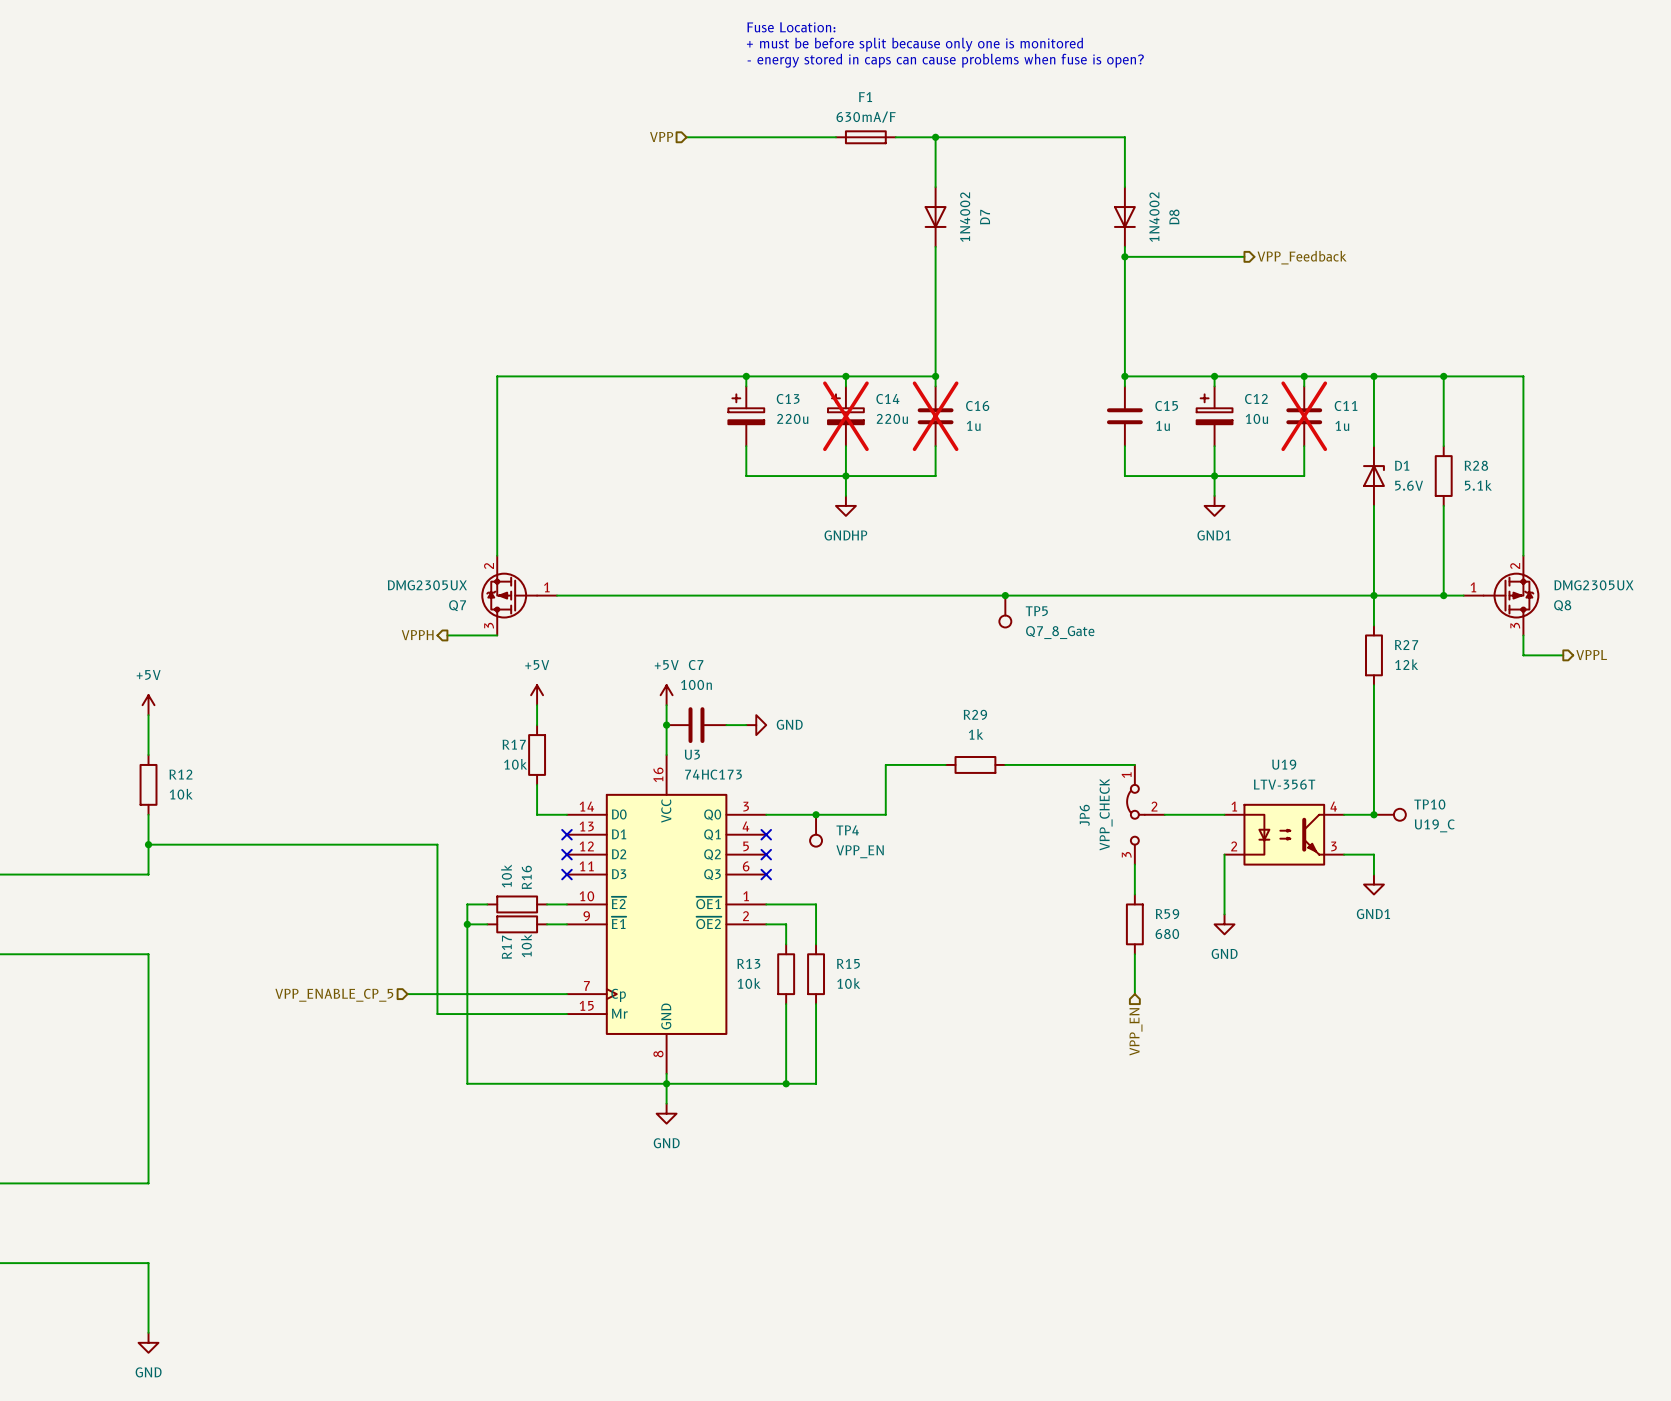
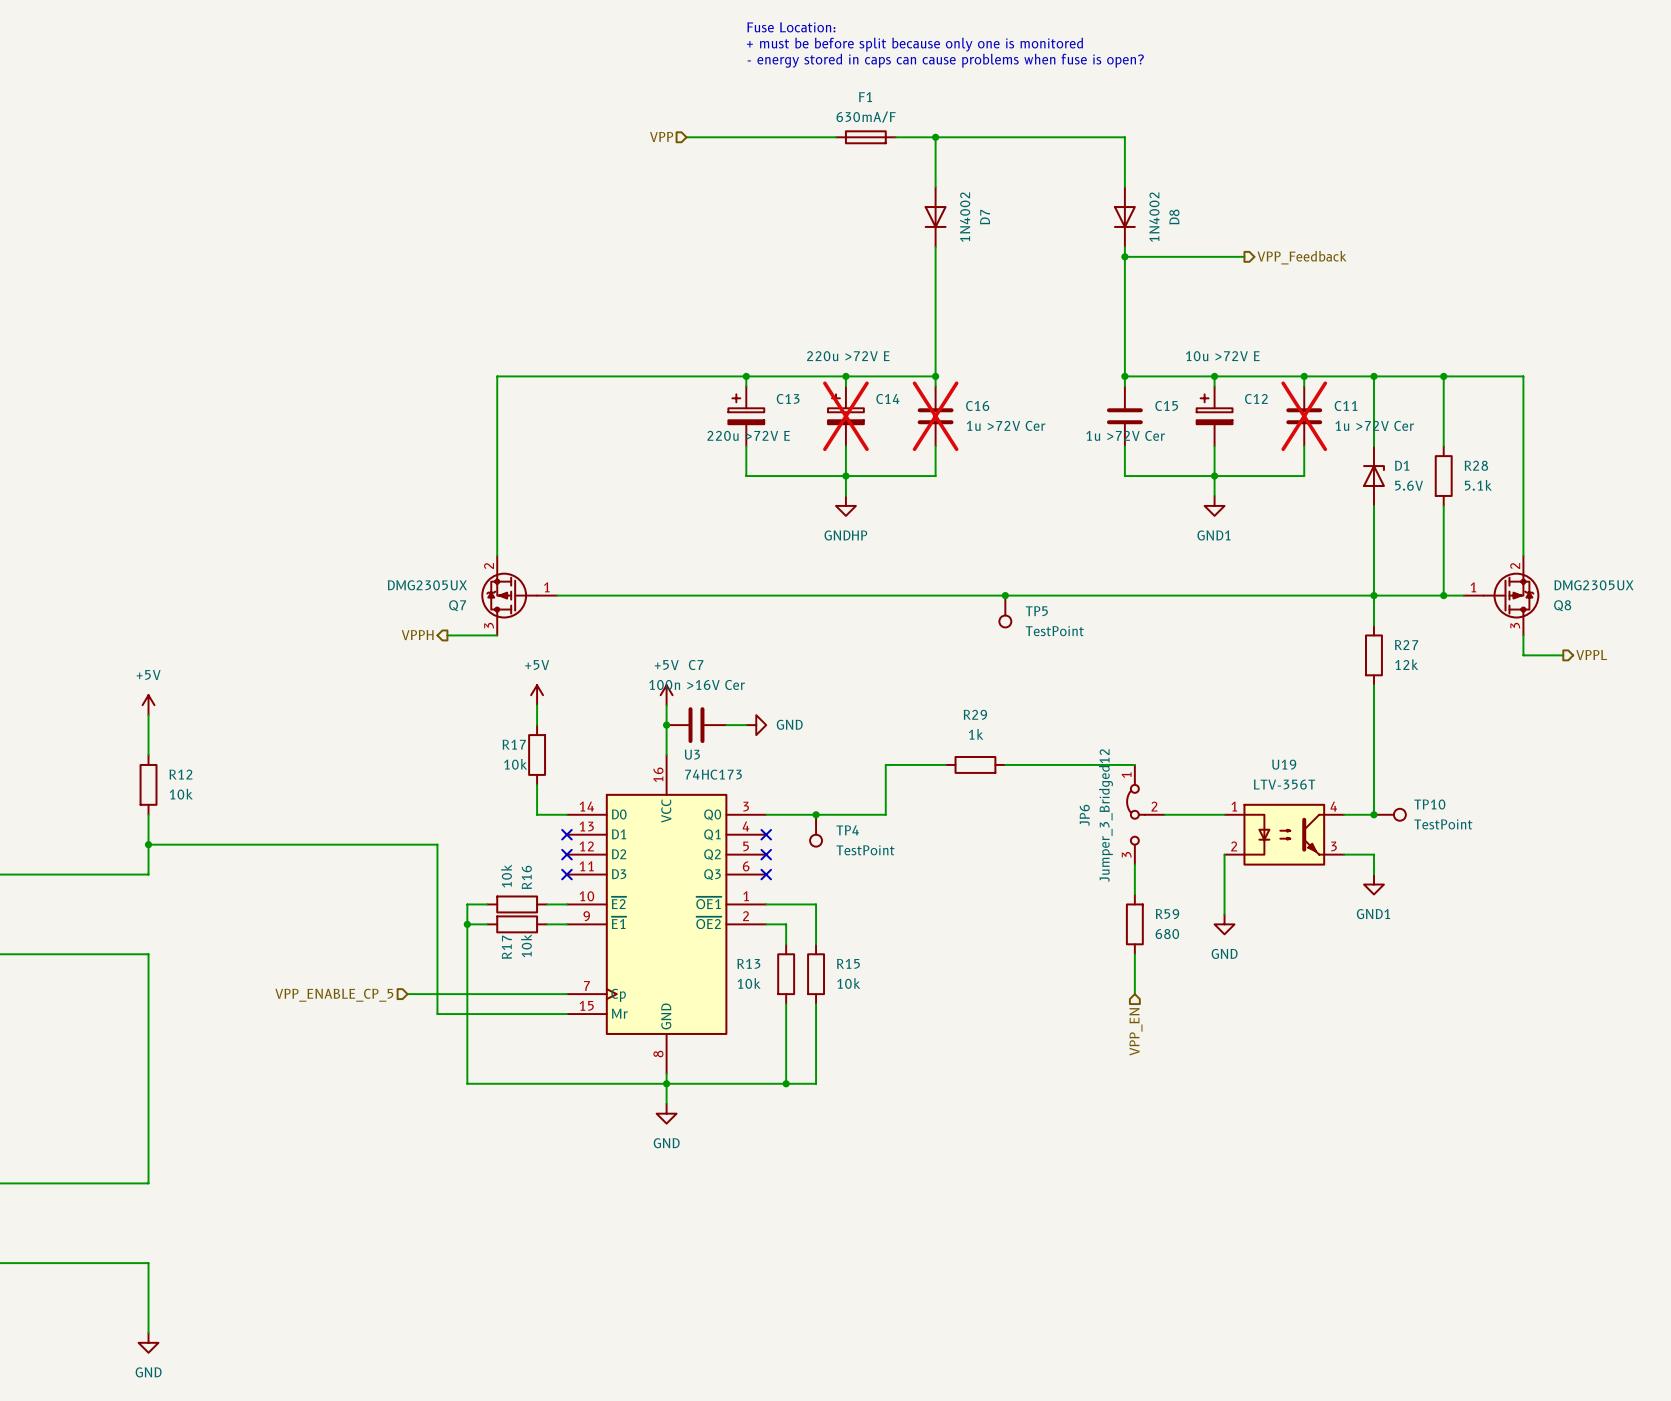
C13 value: 220u (792, 418) -> 220u >72V E (748, 435)
C14 value: 220u (892, 418) -> 220u >72V E (848, 356)
C12 value: 10u (1256, 418) -> 10u >72V E (1222, 356)
C16 value: 1u (973, 425) -> 1u >72V Cer (1006, 425)
C15 value: 1u (1162, 425) -> 1u >72V Cer (1125, 435)
C11 value: 1u (1342, 425) -> 1u >72V Cer (1374, 425)
TP5 value: Q7_8_Gate (1060, 632) -> TestPoint (1054, 631)
C7 value: 100n (696, 684) -> 100n >16V Cer (697, 684)
JP6 value: VPP_CHECK (1106, 814) -> Jumper_3_Bridged12 (1105, 815)
TP10 value: U19_C (1434, 825) -> TestPoint (1443, 824)
TP4 value: VPP_EN (860, 851) -> TestPoint (865, 850)

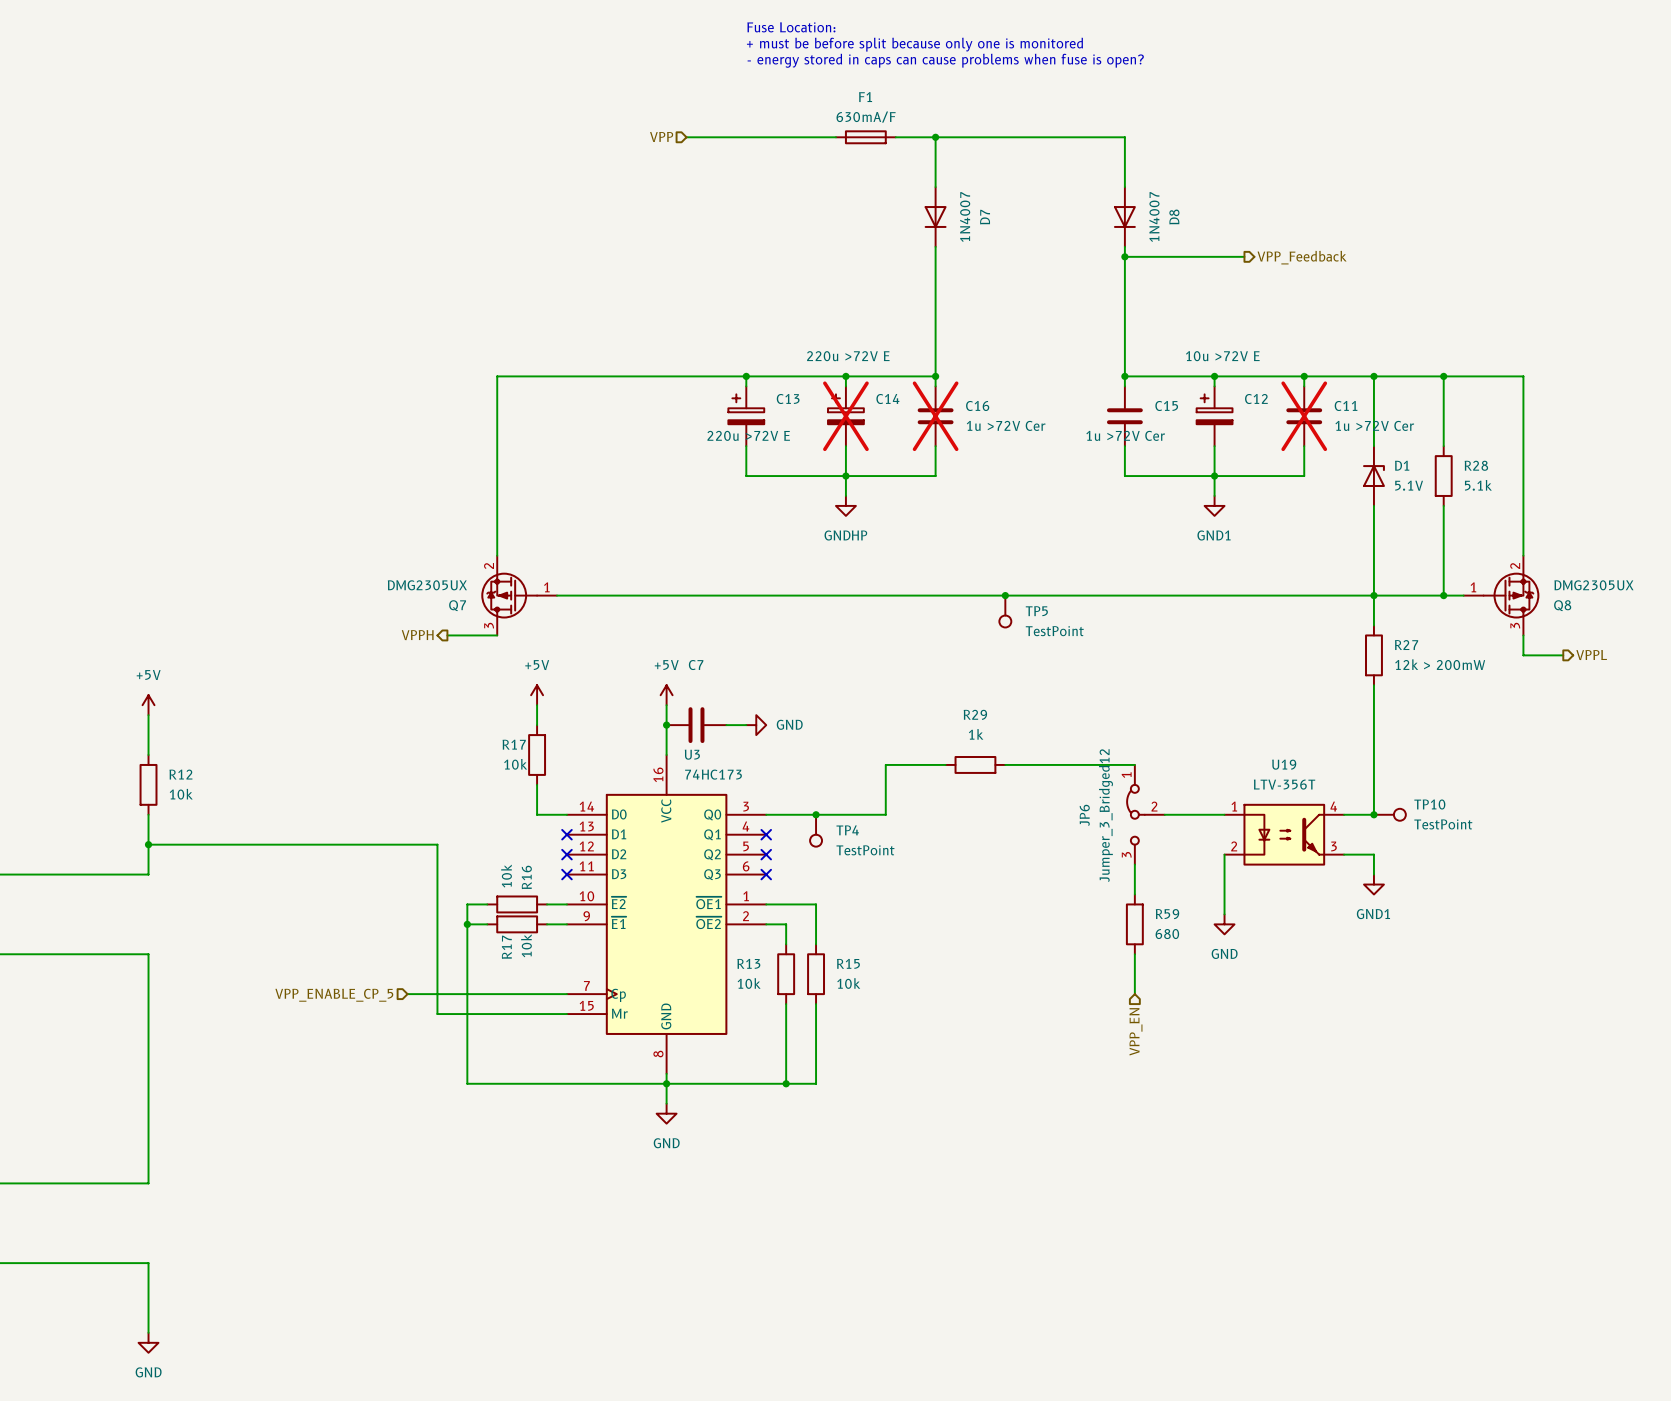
D7 value: 1N4002 (965, 217) -> 1N4007 (965, 217)
D8 value: 1N4002 (1154, 217) -> 1N4007 (1154, 217)
D1 value: 5.6V (1409, 485) -> 5.1V (1409, 485)
R27 value: 12k (1406, 664) -> 12k > 200mW (1440, 664)
C7 value: 100n >16V Cer (697, 684) -> none

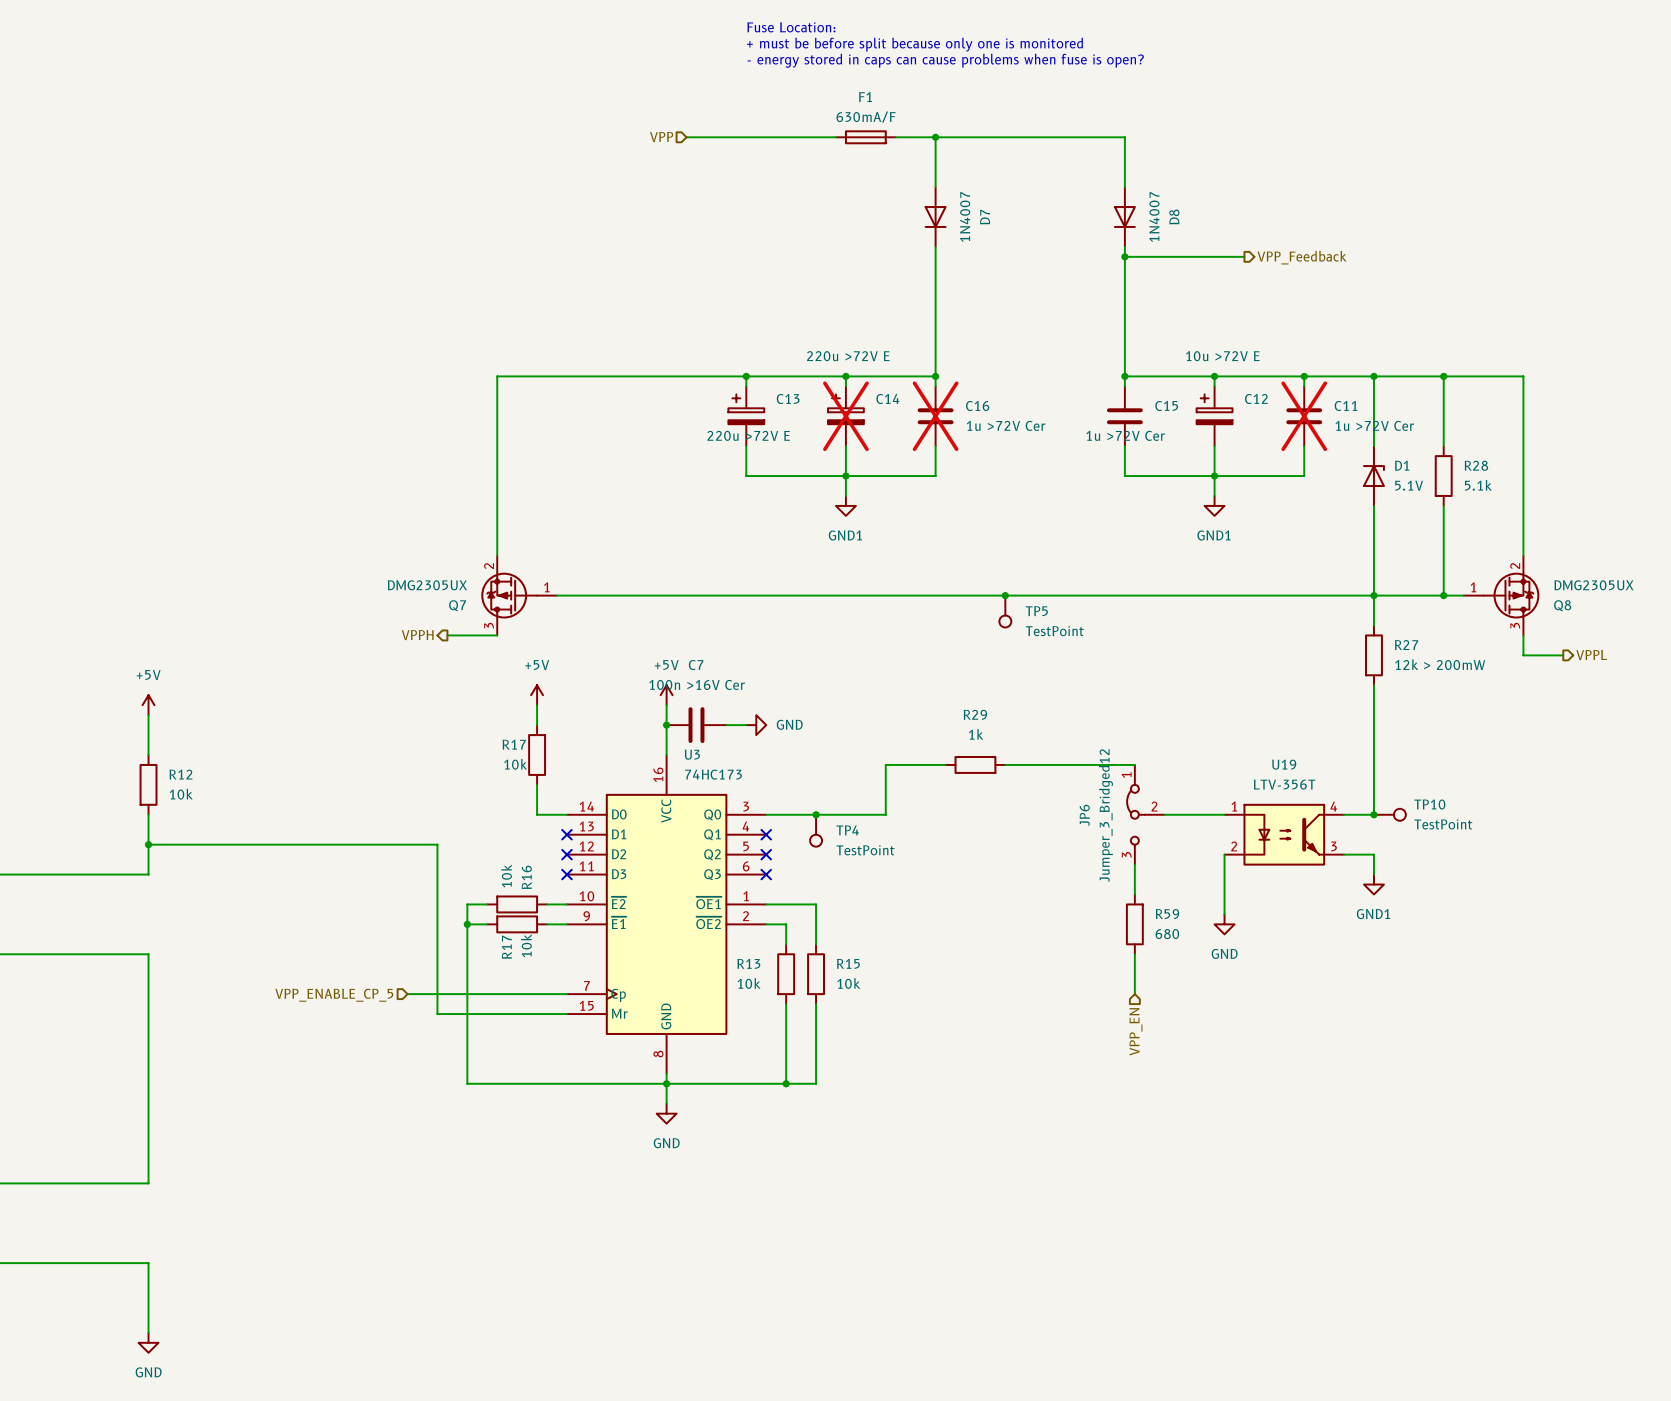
power symbol: GNDHP (845, 505) -> GND1 (845, 505)
C7 value: none -> 100n >16V Cer (697, 684)

